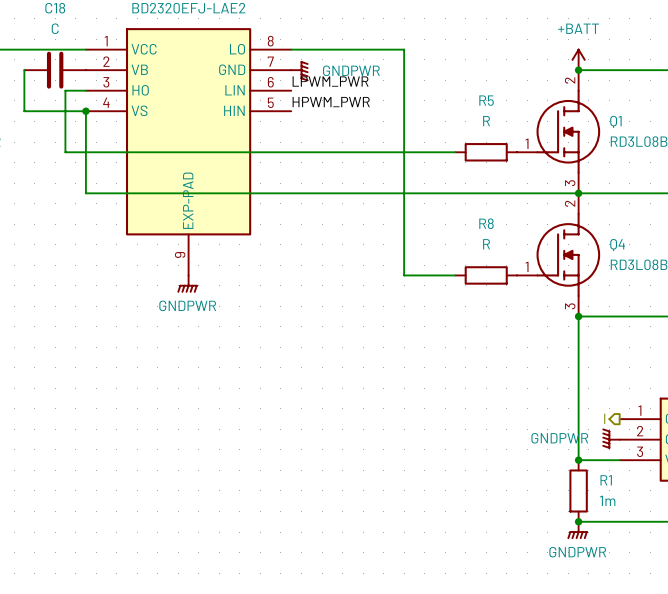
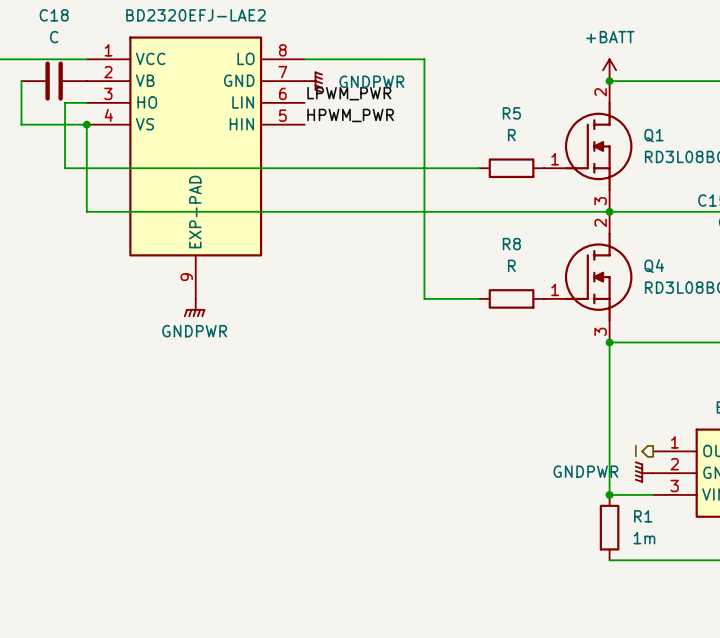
junction: (578, 521) -> none
power symbol: GNDPWR (577, 530) -> none

